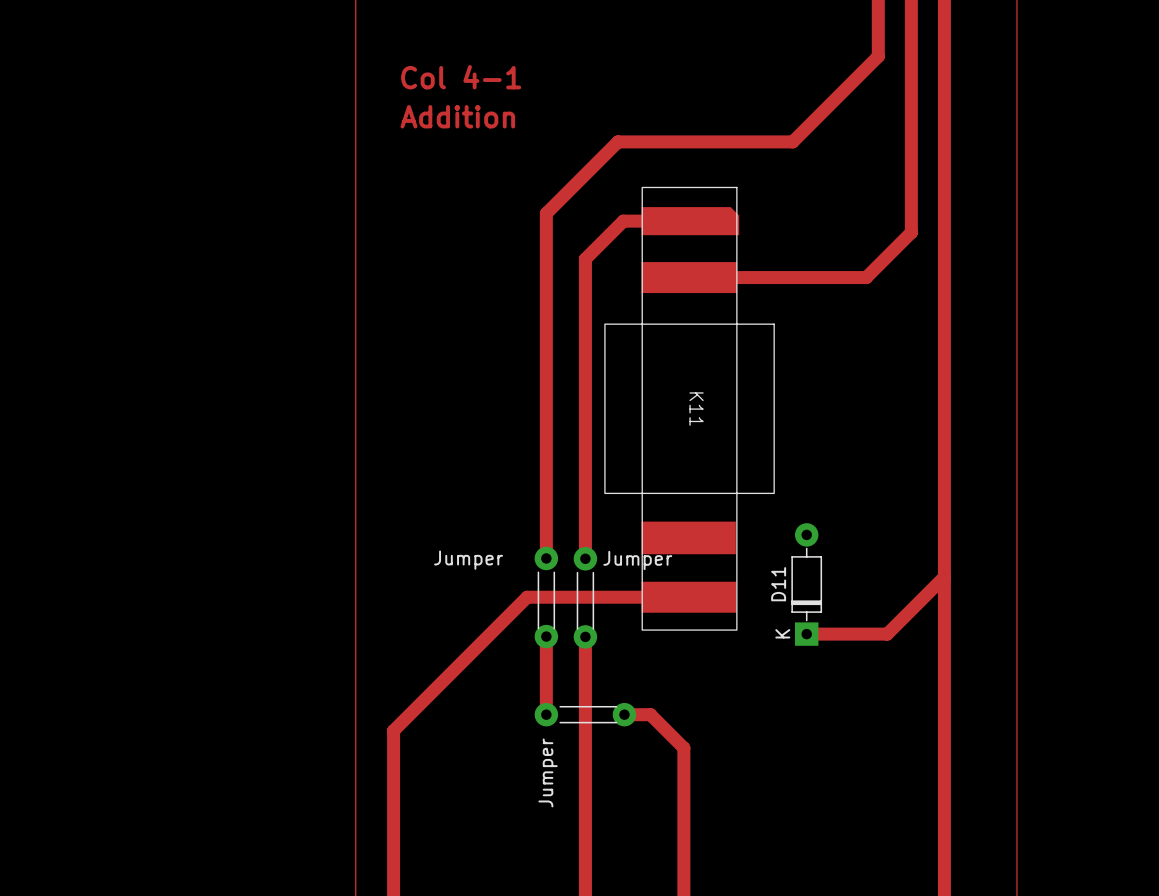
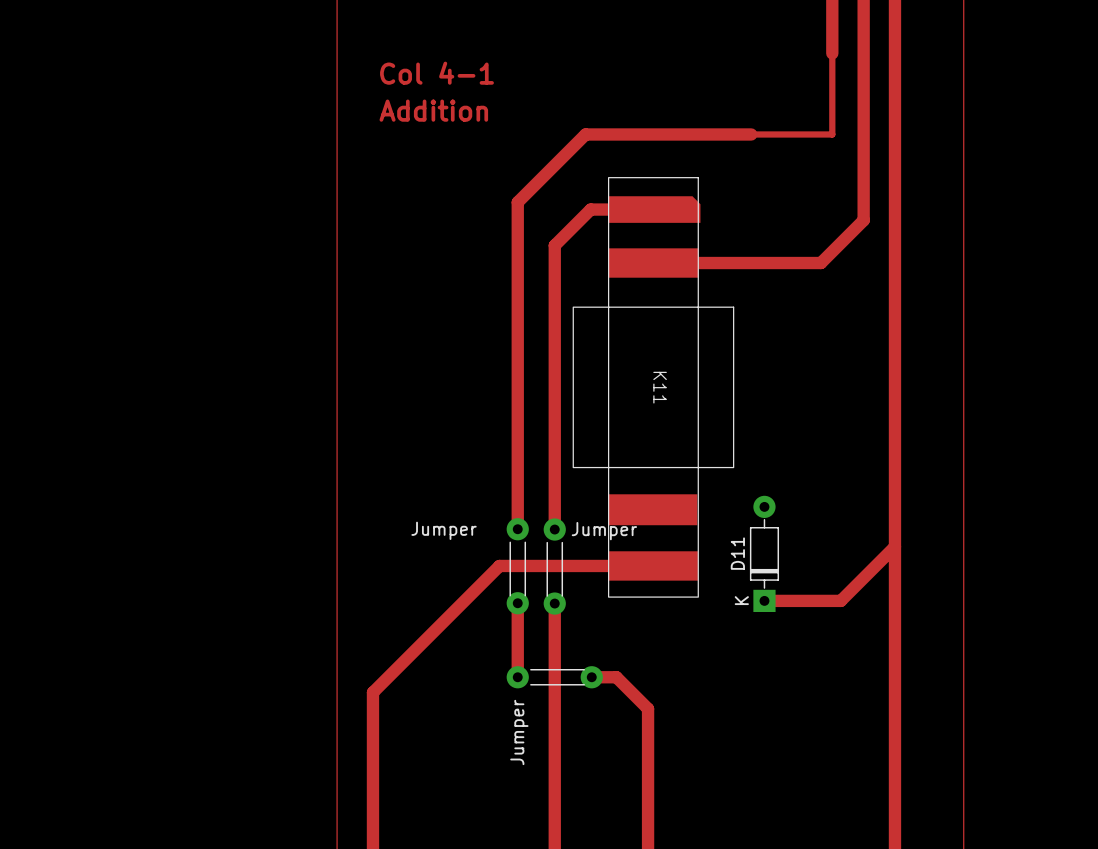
top track: (878, 56) (792, 141) -> (832, 53) (832, 134) (751, 134)

